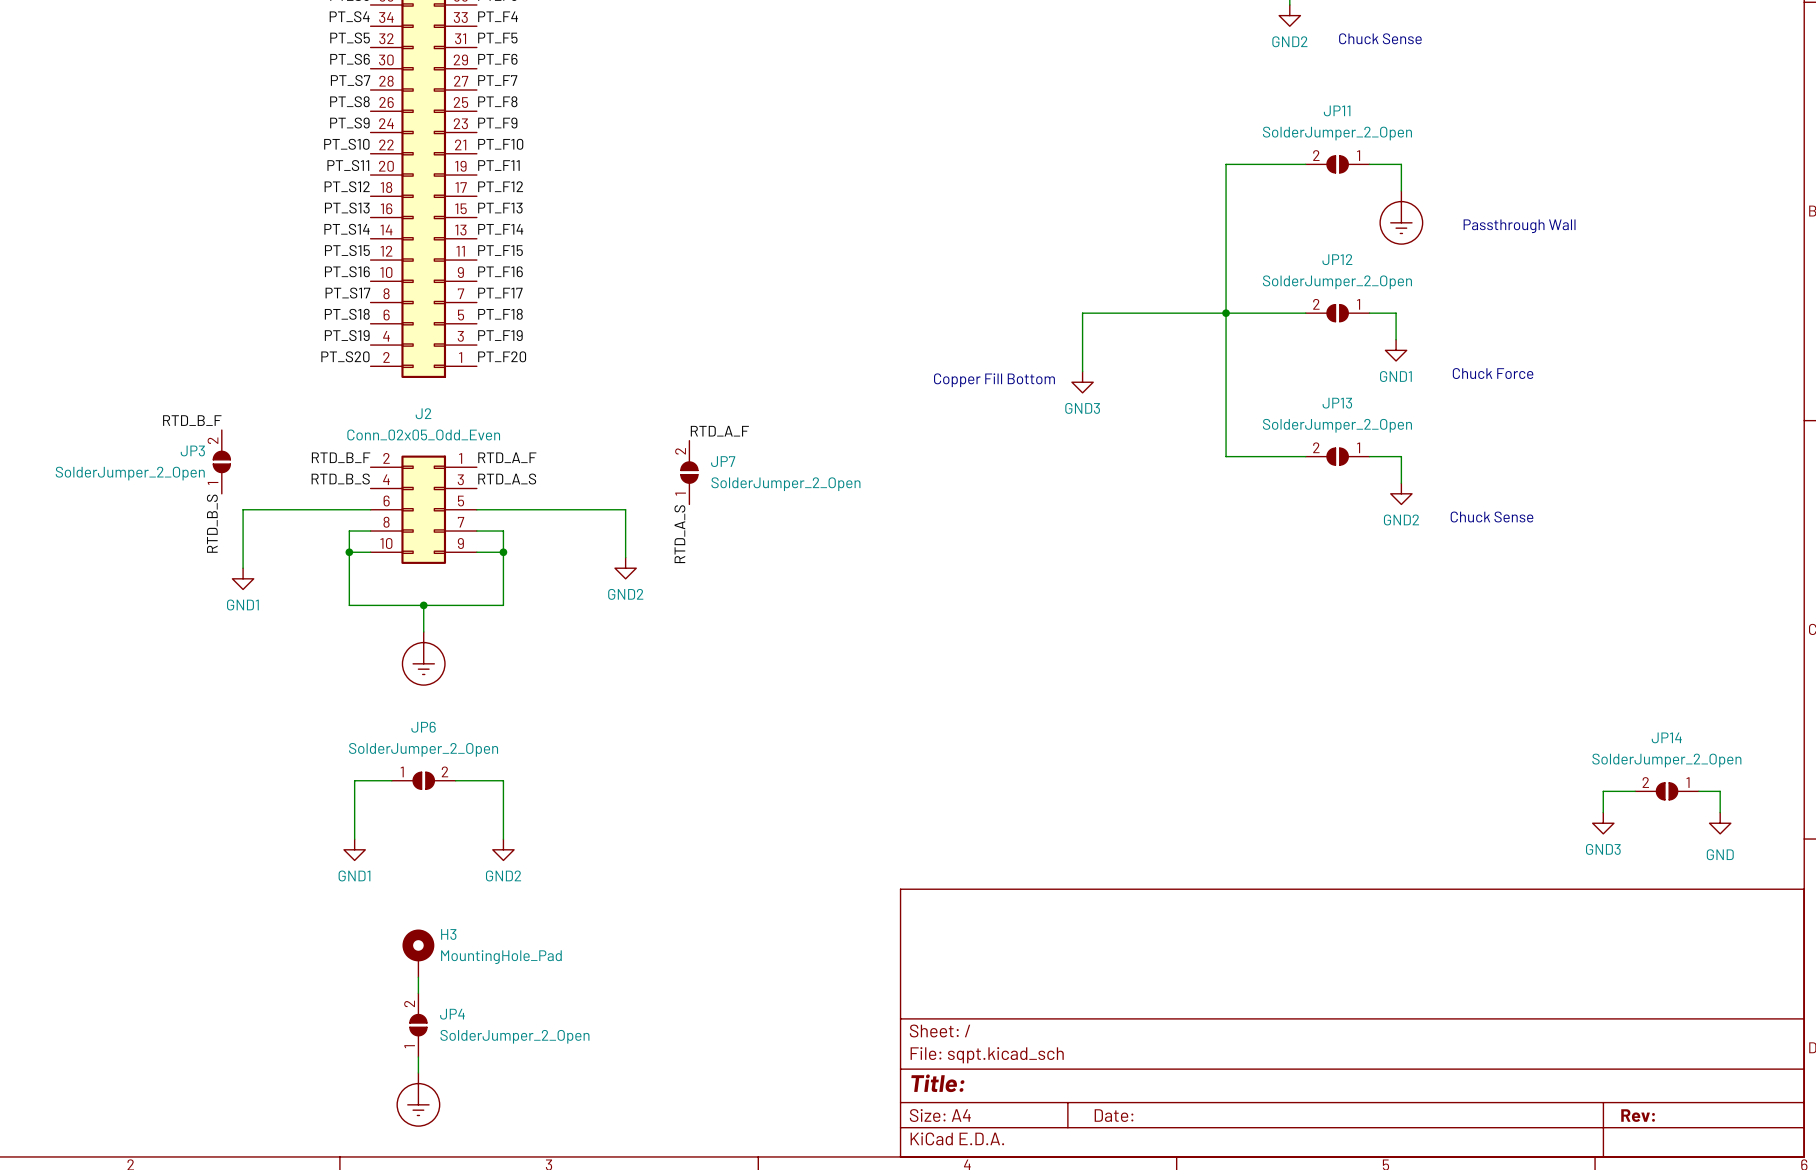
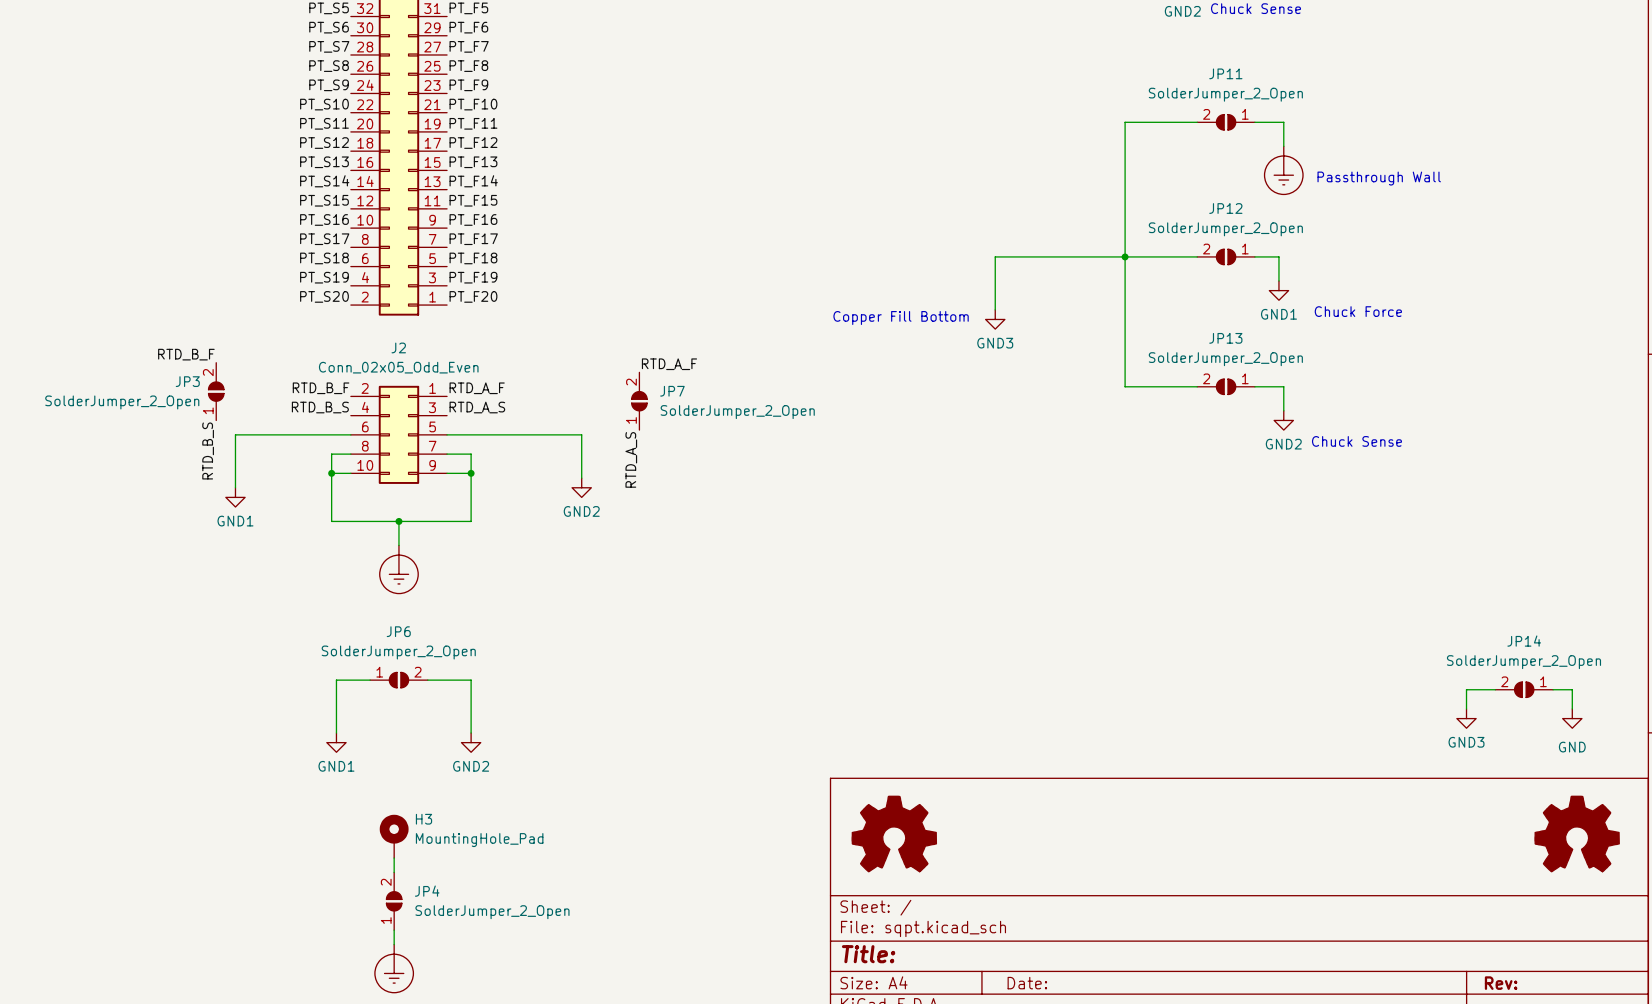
part: none -> (894, 834)
part: none -> (1577, 834)

